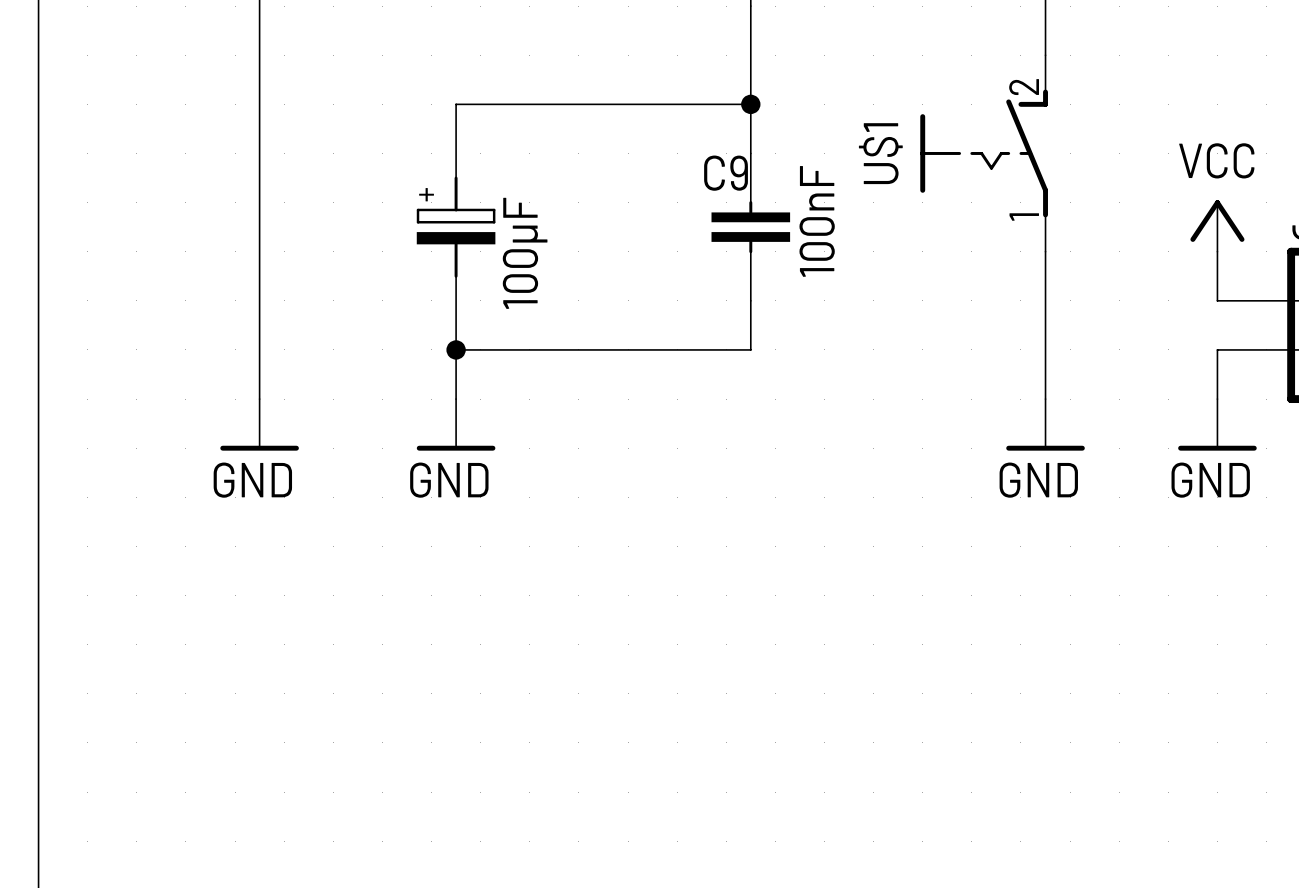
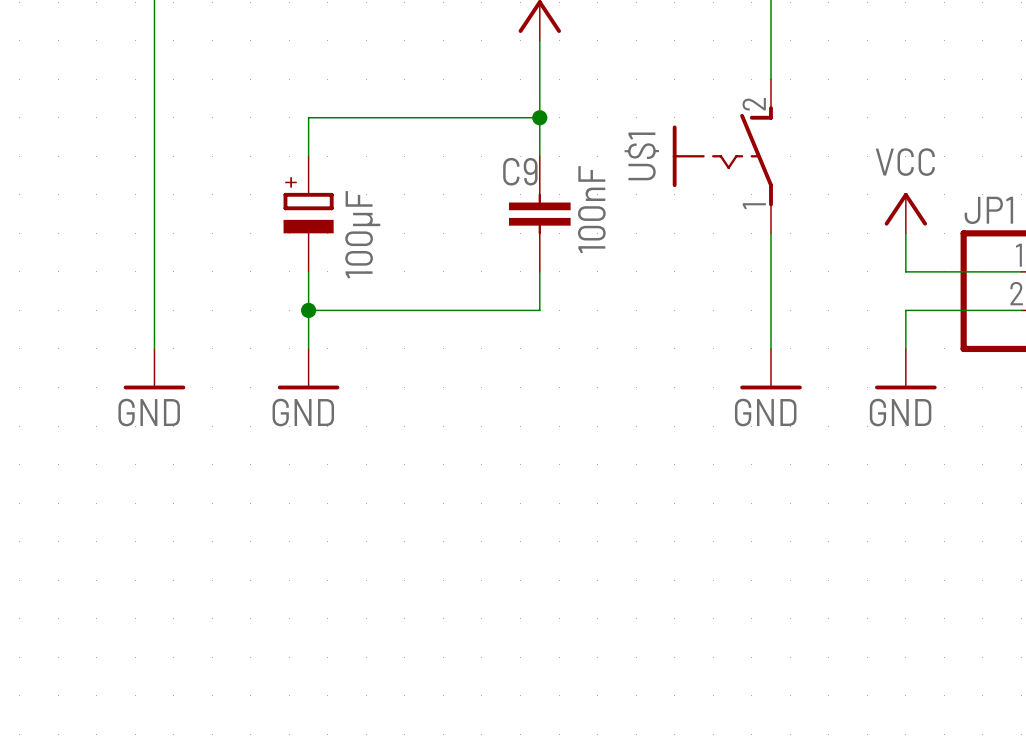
part symbol: [416, 176, 496, 278] -> [283, 156, 334, 272]

